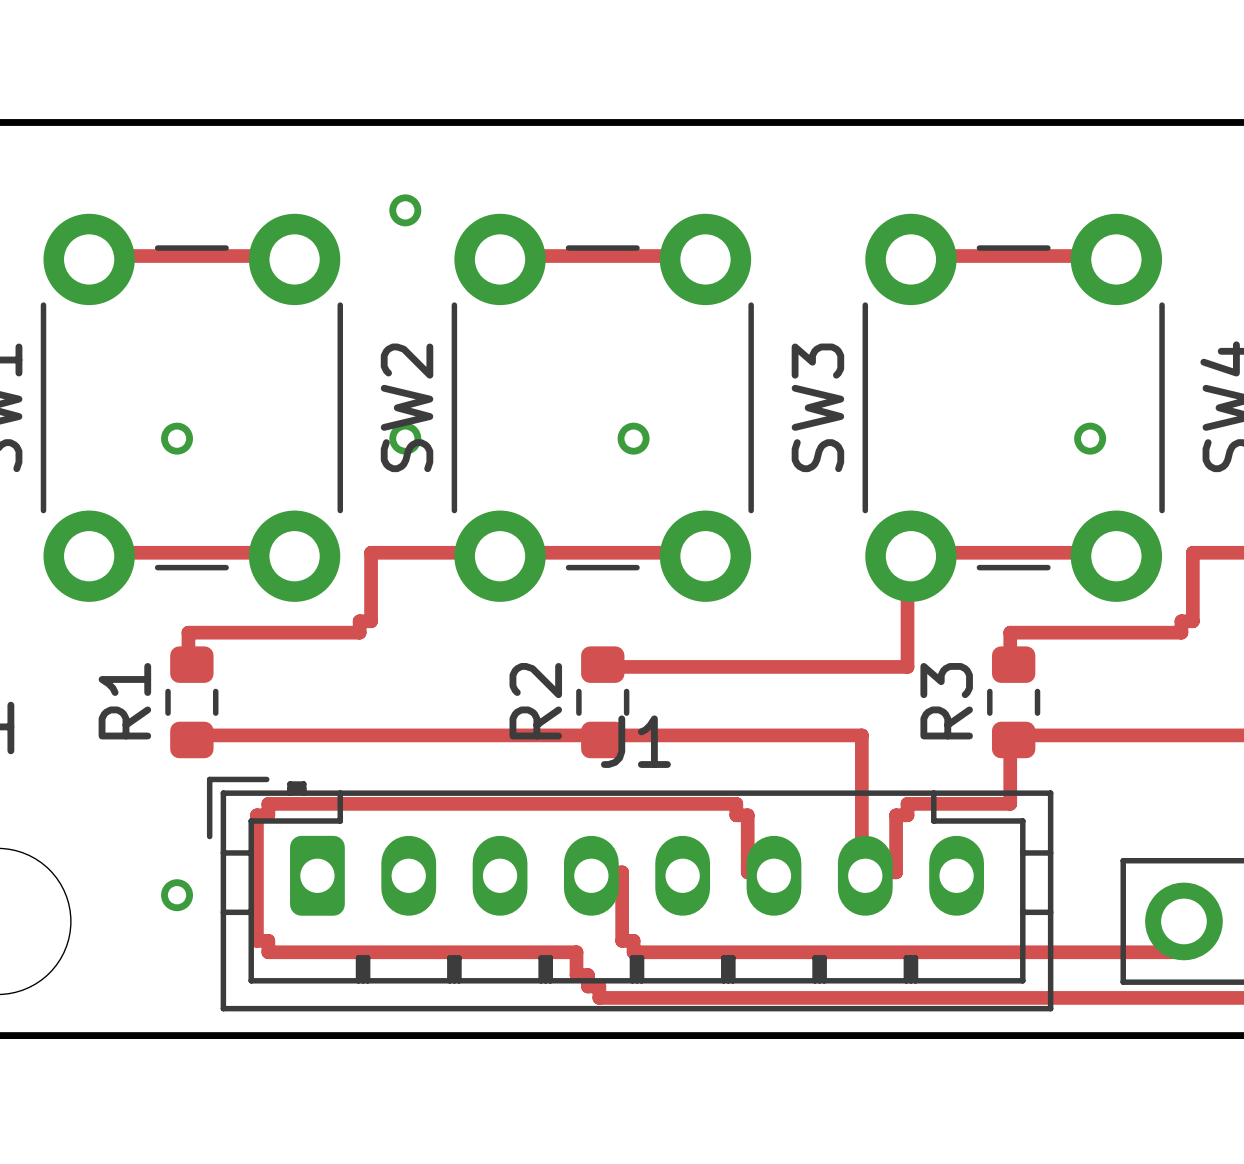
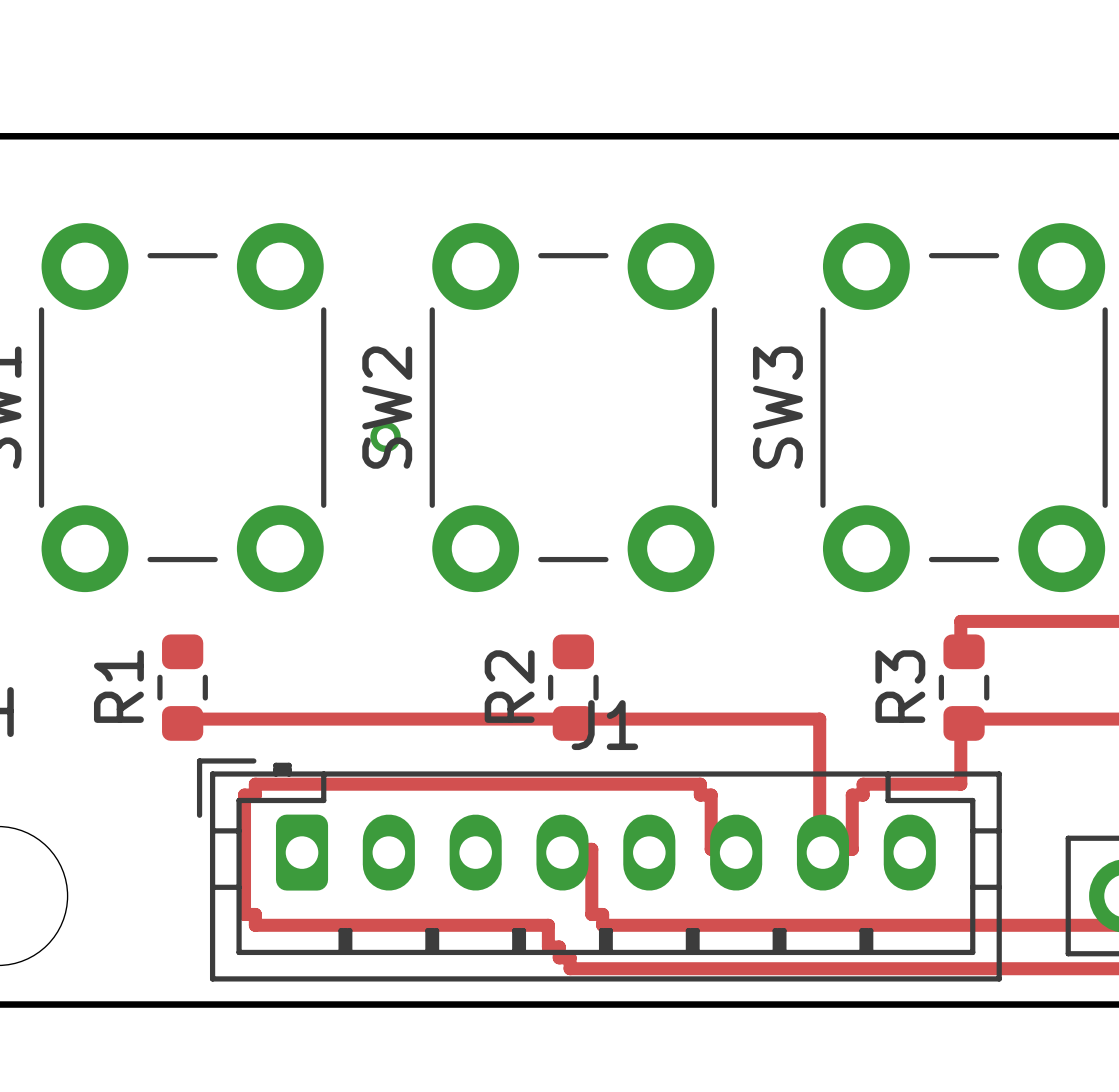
via: (405, 210) -> none
track: (85, 256) (291, 256) -> none
track: (496, 256) (702, 256) -> none
track: (907, 256) (1112, 256) -> none
via: (177, 438) -> none
via: (633, 438) -> none
via: (1090, 438) -> none
track: (85, 552) (291, 552) -> none
track: (702, 552) (371, 552) (371, 621) (359, 621) (359, 632) (188, 632) (188, 666) -> none
track: (1112, 552) (907, 552) (907, 666) (599, 666) -> none
via: (177, 895) -> none

